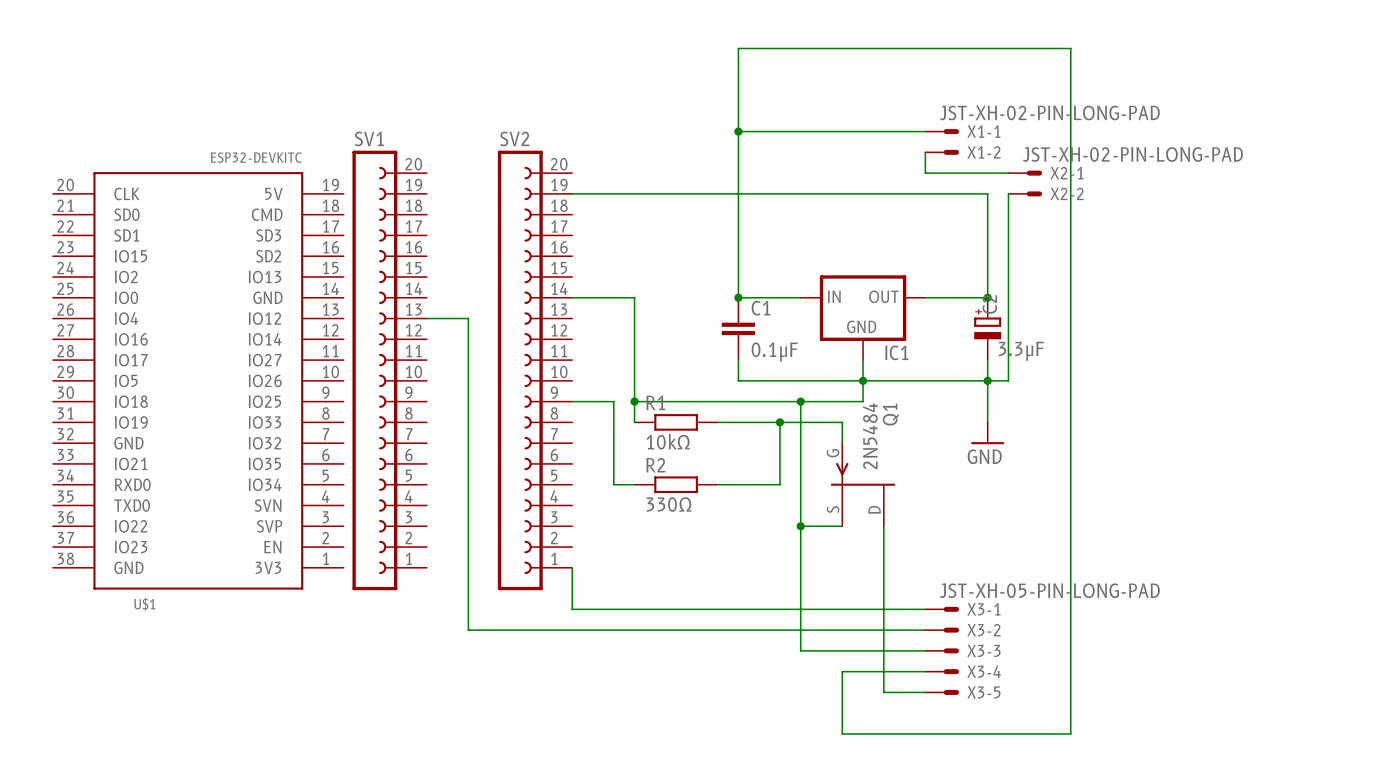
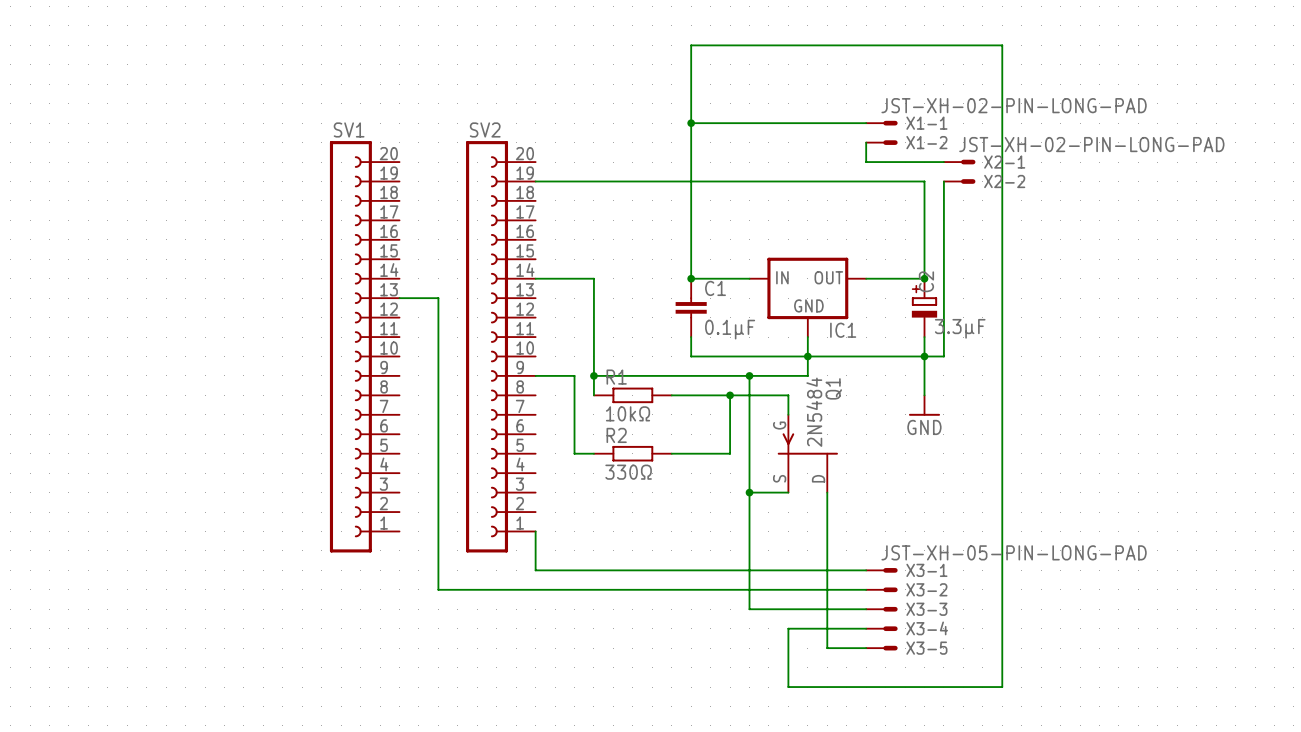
U$1: (198, 380) -> none

